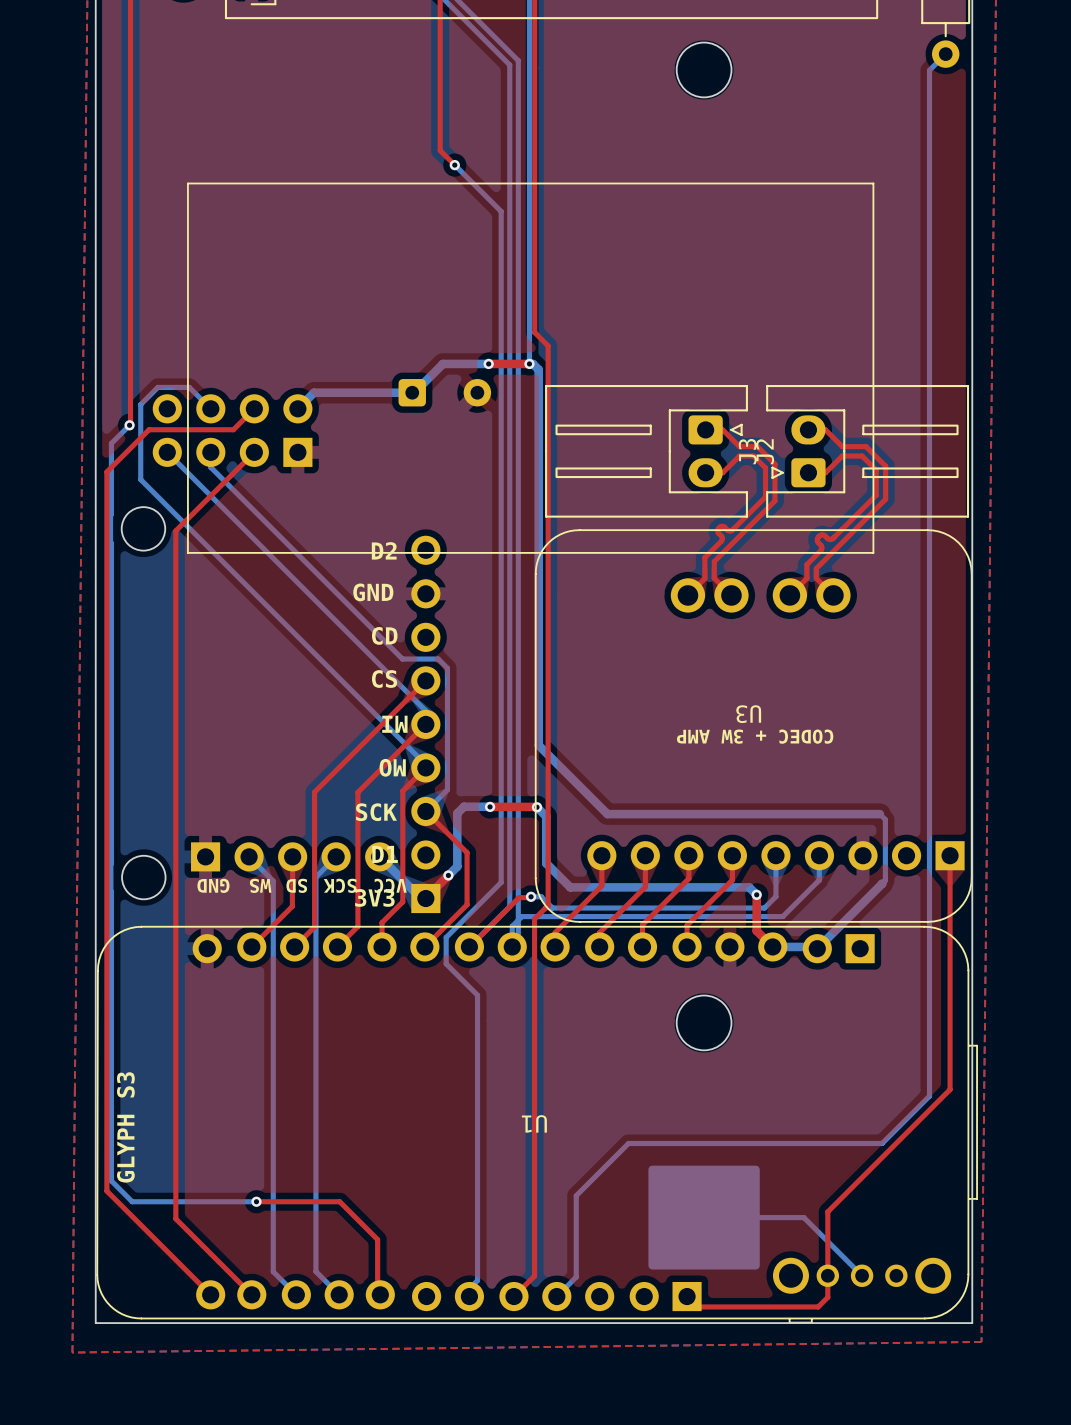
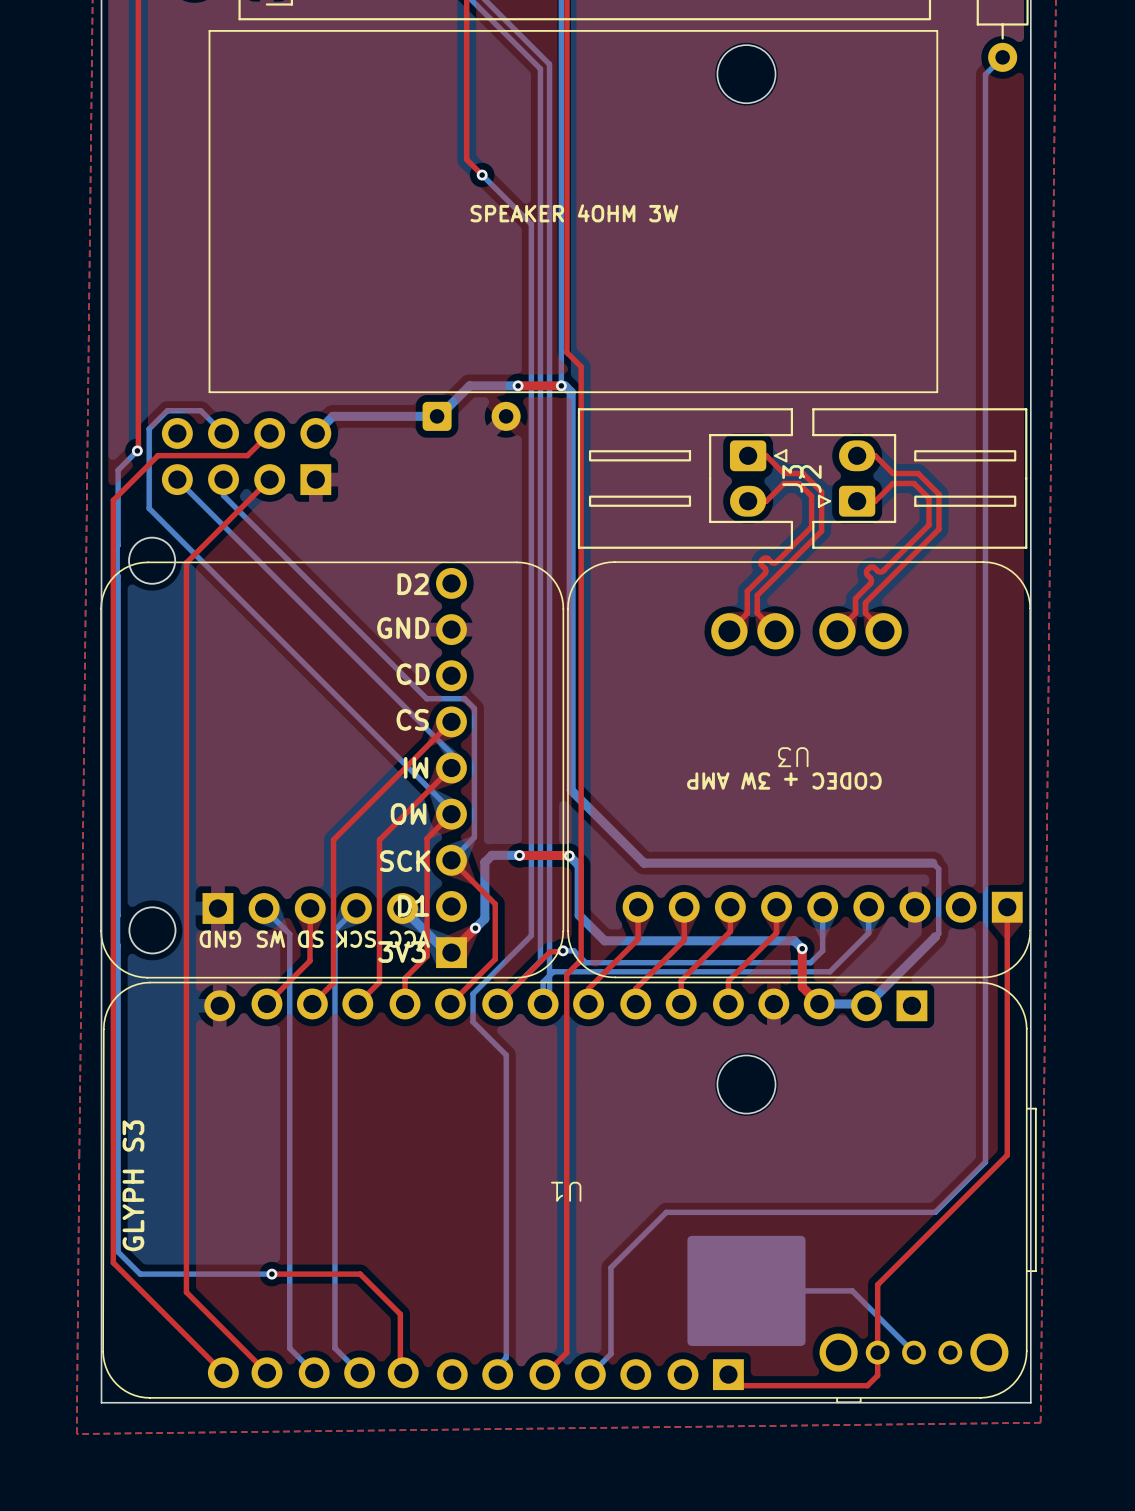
line: none -> (209, 30) (937, 30) (937, 392) (209, 392) (209, 30)
line: (187, 183) (873, 183) (873, 552) (187, 552) (187, 183) -> none
text: none -> SPEAKER 4OHM 3W (574, 213)
part: none -> (332, 770)

